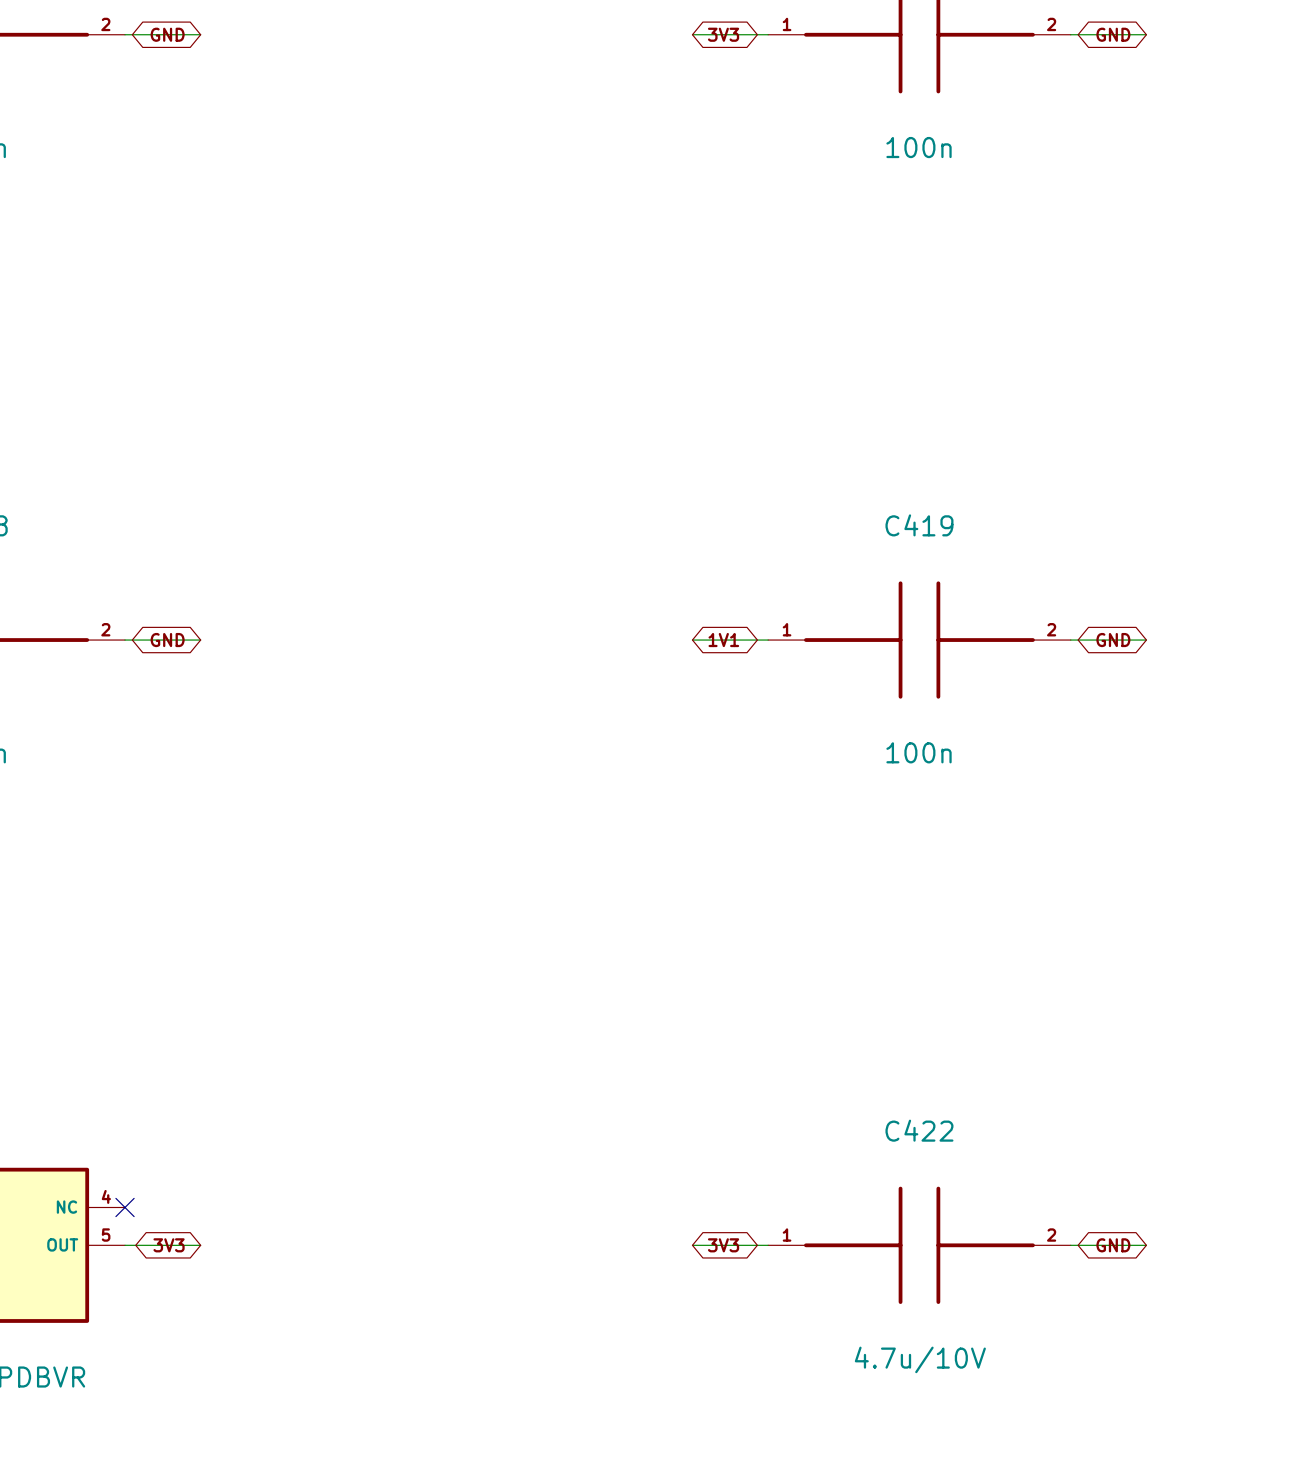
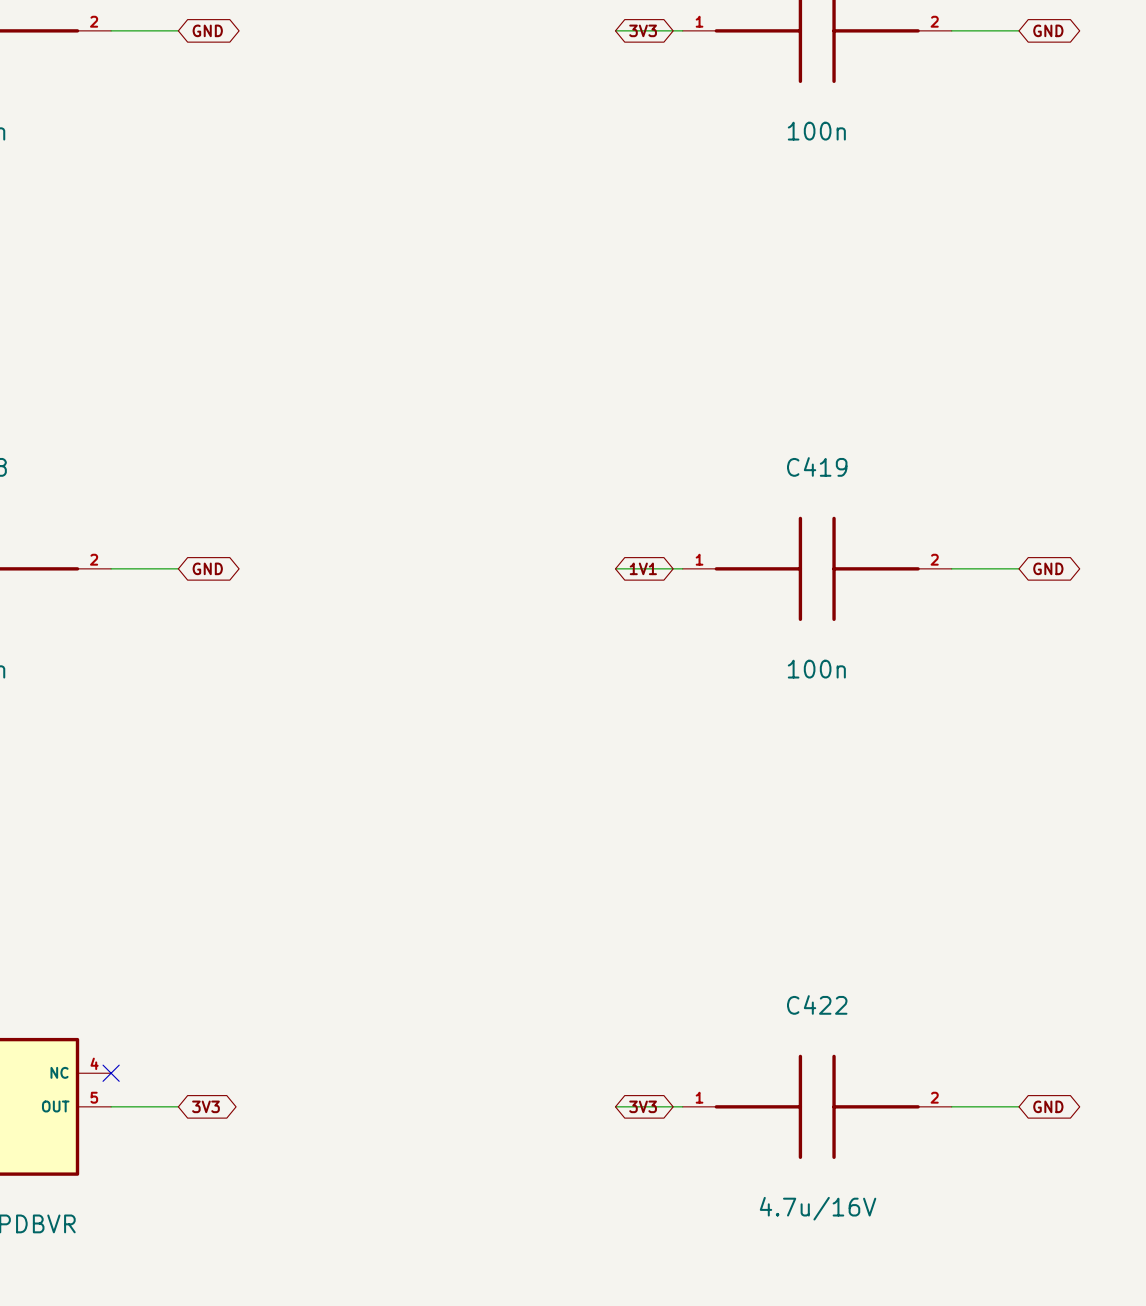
global label rotation: 0° (167, 34) -> 180° (207, 30)
global label rotation: 0° (1113, 34) -> 180° (1048, 30)
global label rotation: 0° (167, 640) -> 180° (207, 568)
global label rotation: 0° (1113, 640) -> 180° (1048, 568)
global label rotation: 0° (169, 1245) -> 180° (205, 1106)
global label position: 3V3 (169, 1245) -> 3V3 (205, 1106)
global label rotation: 0° (1113, 1245) -> 180° (1048, 1106)
C422 value: 4.7u/10V (920, 1359) -> 4.7u/16V (818, 1208)

